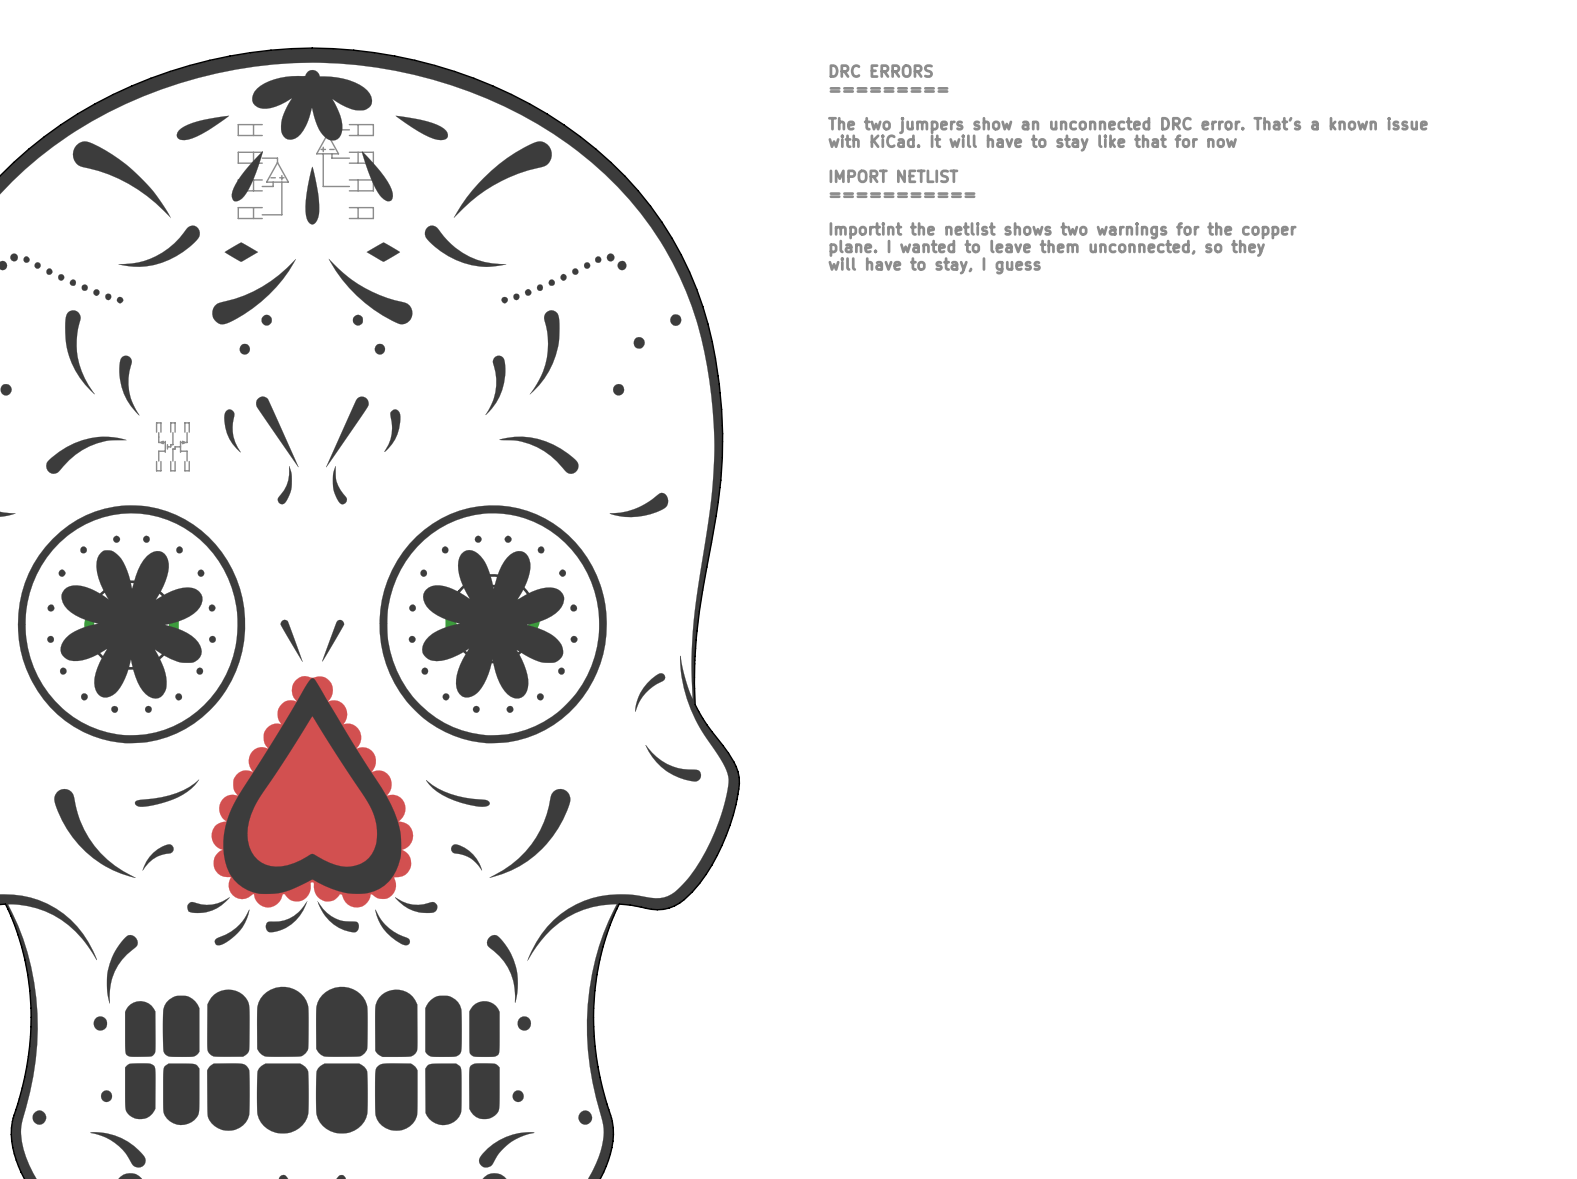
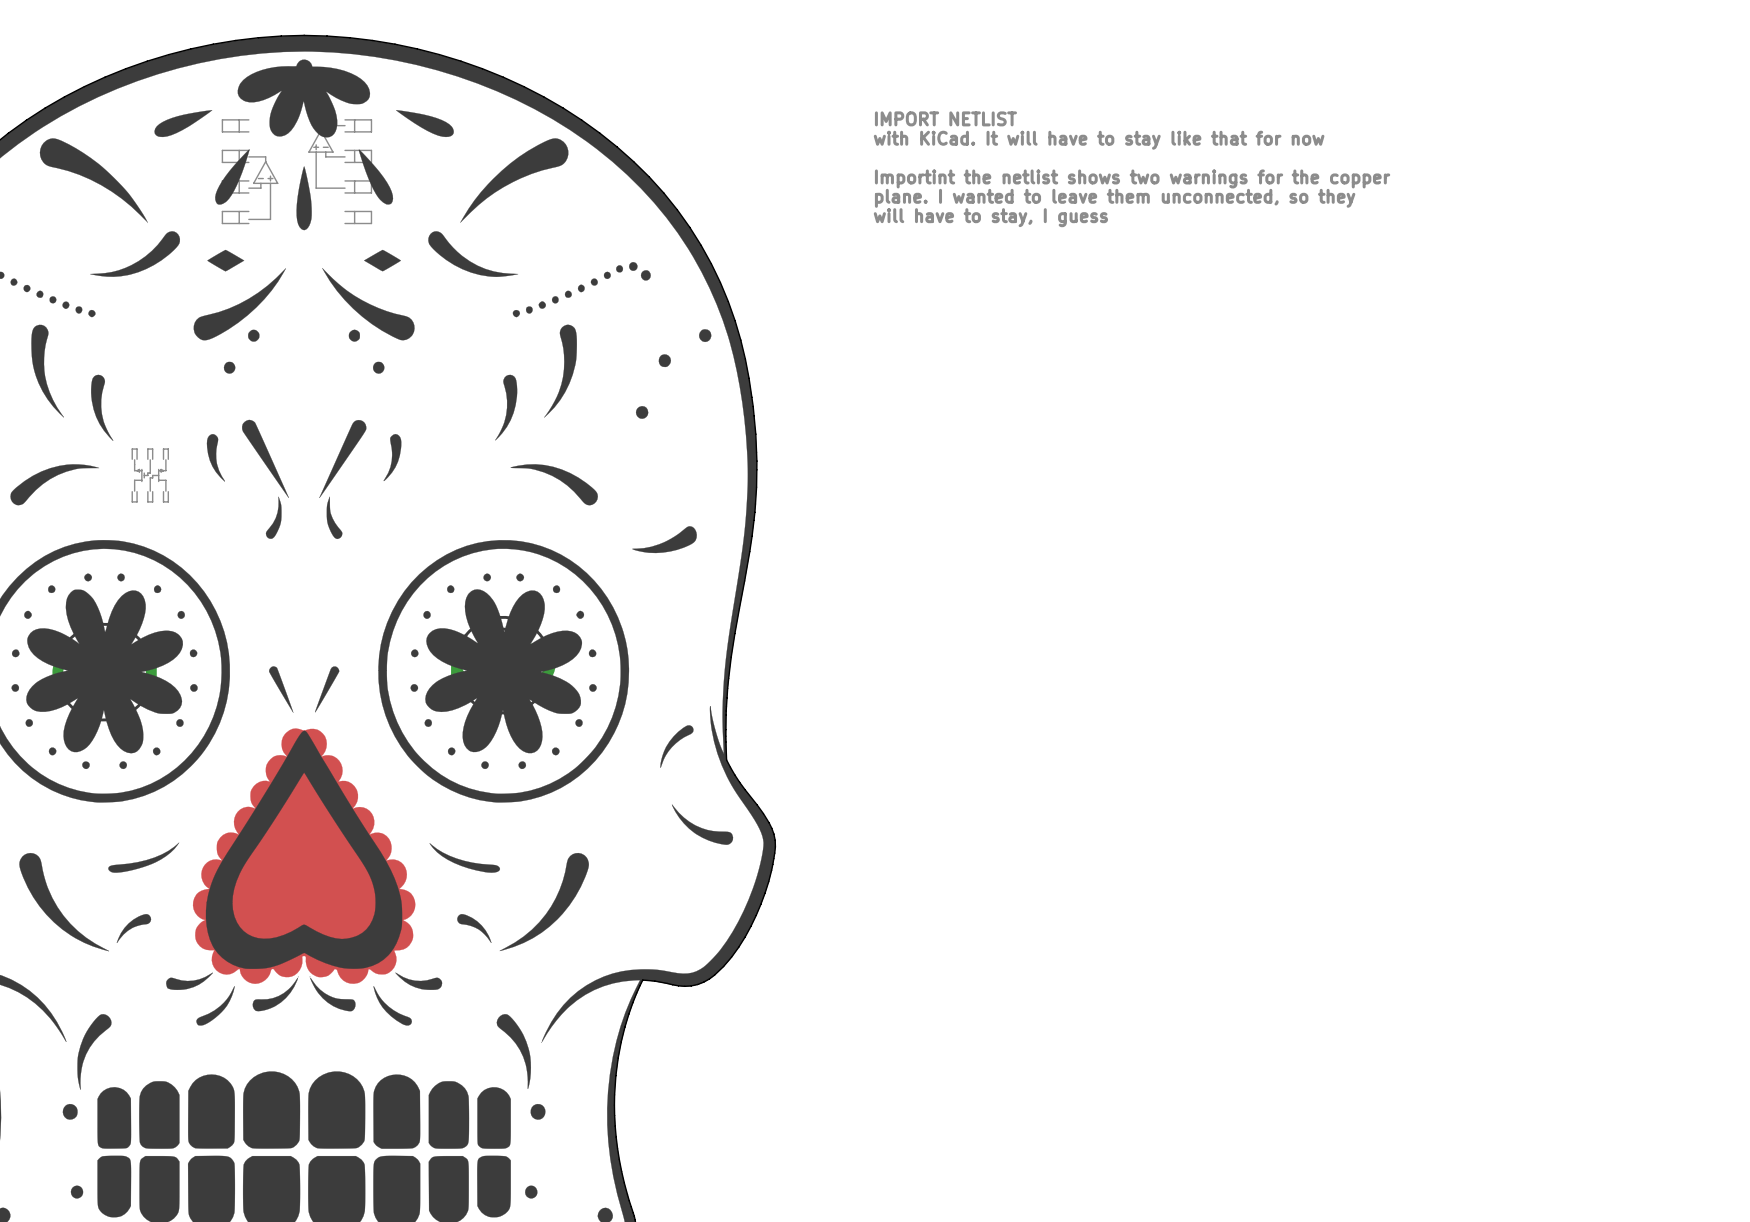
text: DRC ERRORS (881, 71) -> none
text: ========= (889, 89) -> none
text: The two jumpers show an unconnected DRC error. That's a known issue (1127, 125) -> IMPORT NETLIST (945, 118)
text: IMPORT NETLIST (893, 176) -> Importint the netlist shows two warnings for the copper (1132, 178)
text: =========== (902, 195) -> plane. I wanted to leave them unconnected, so they (1115, 198)
text: Importint the netlist shows two warnings for the copper (1063, 230) -> none
text: plane. I wanted to leave them unconnected, so they (1047, 248) -> none
text position: will have to stay, I guess (934, 265) -> will have to stay, I guess (990, 217)

